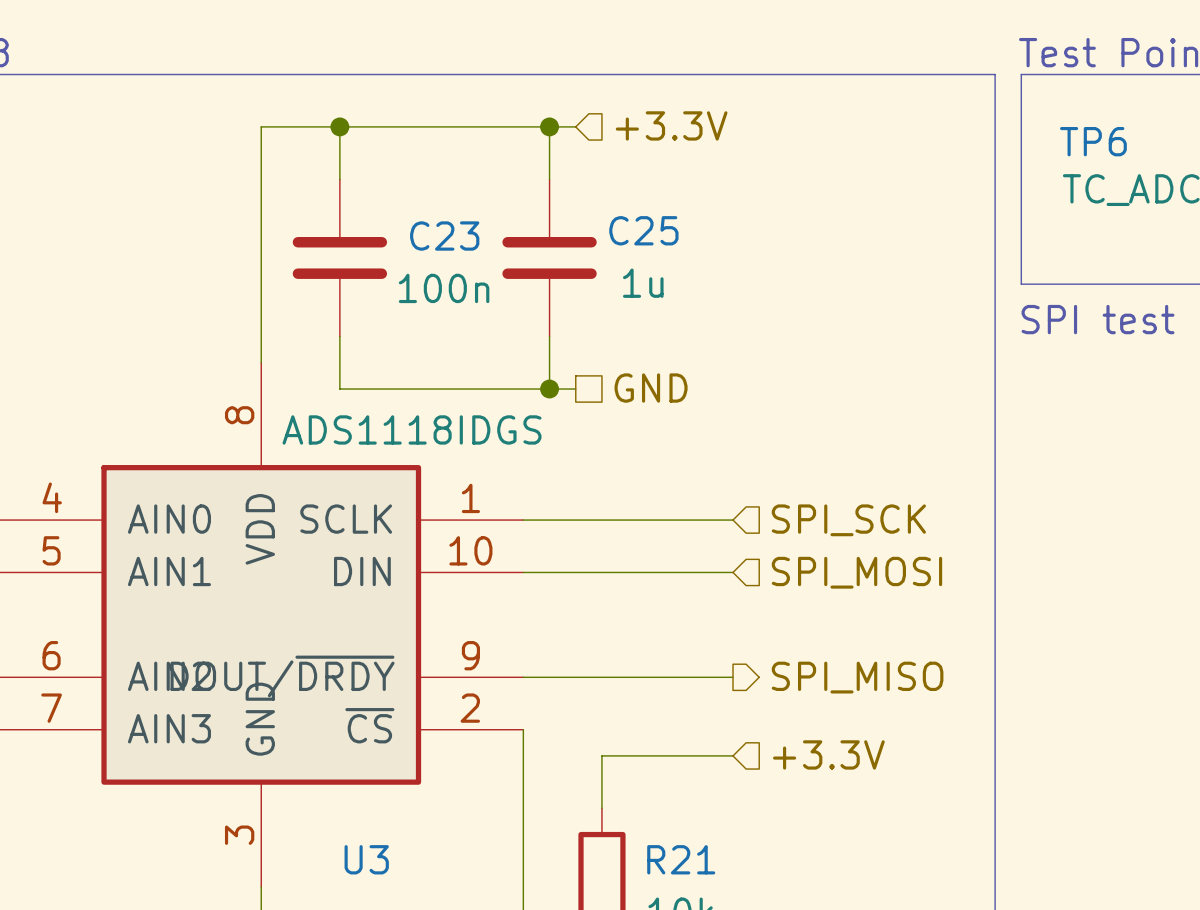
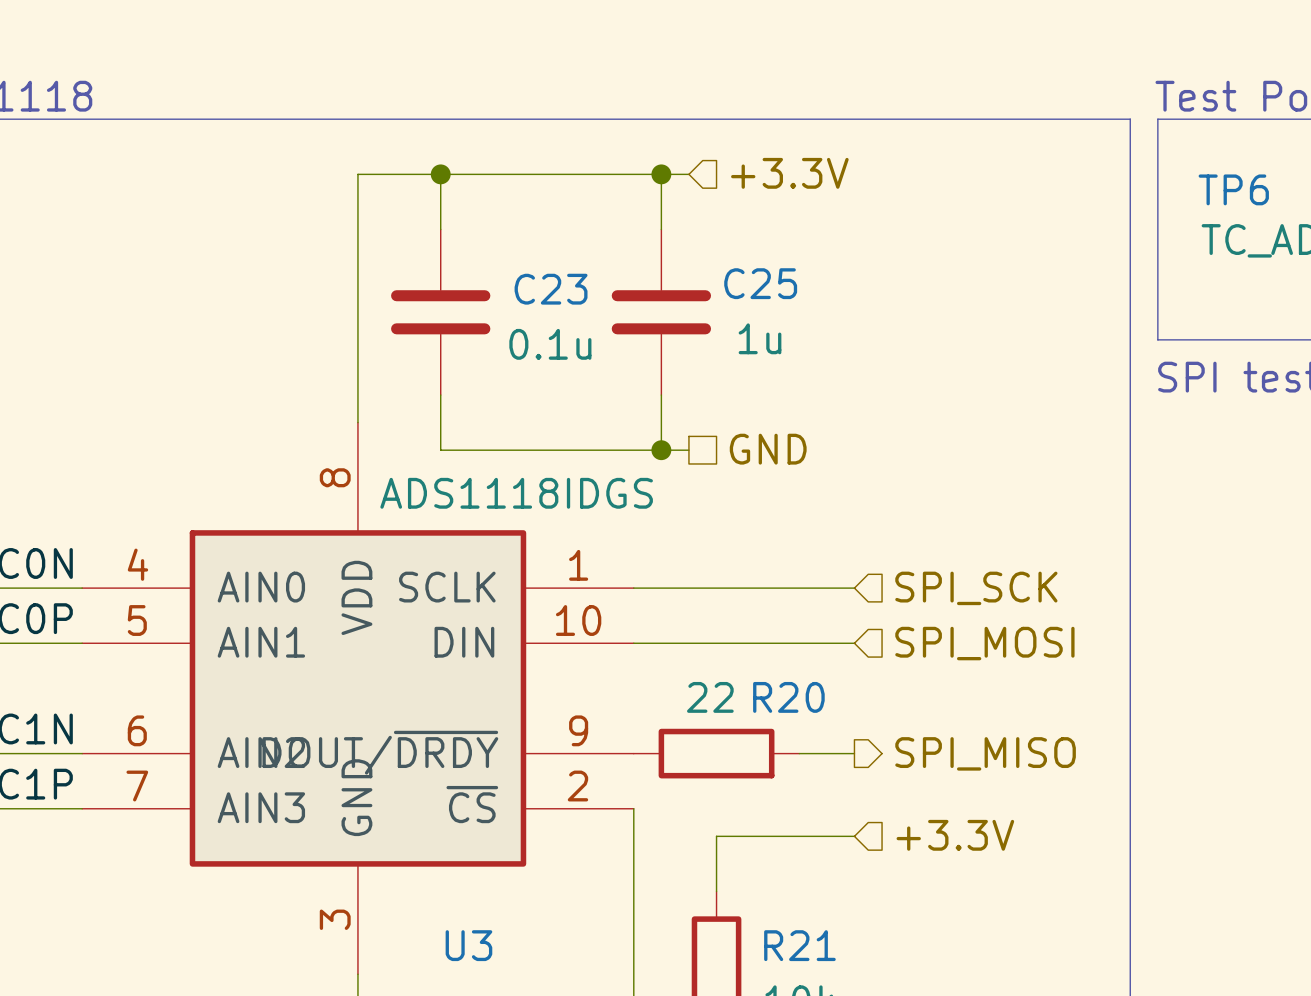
C23 value: 100n (444, 288) -> 0.1u (550, 344)
wire: (523, 677) (680, 677) -> none
R20: none -> 22 (716, 753)

